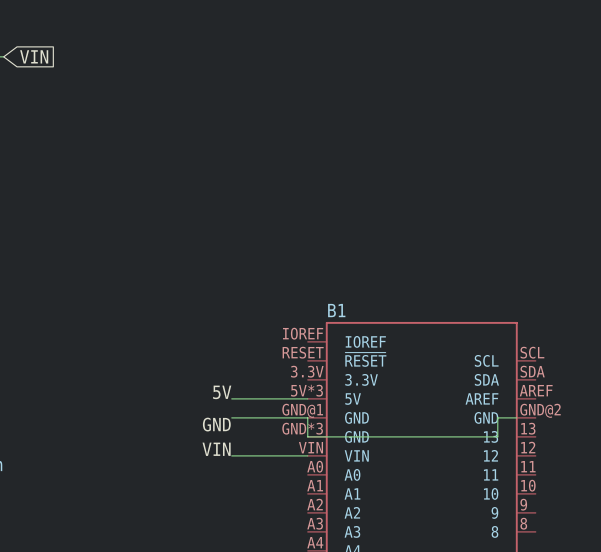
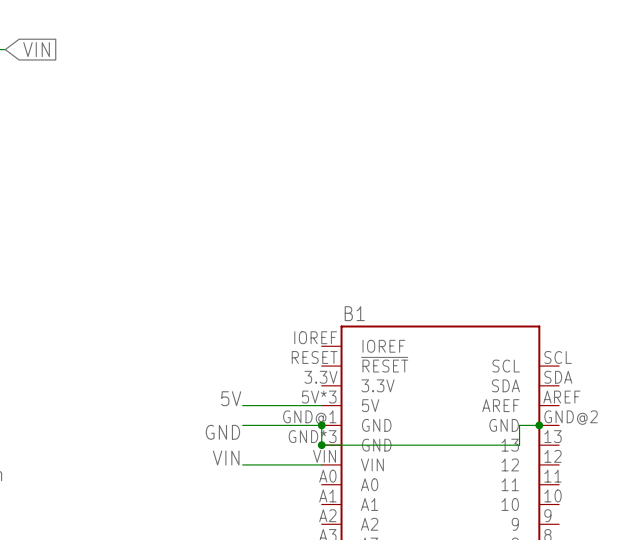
junction: none -> (321, 425)
junction: none -> (539, 425)
junction: none -> (321, 445)

